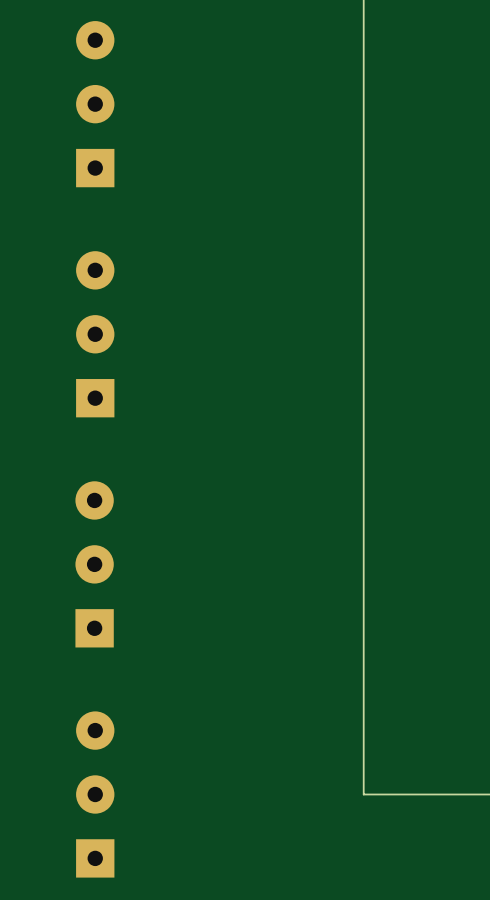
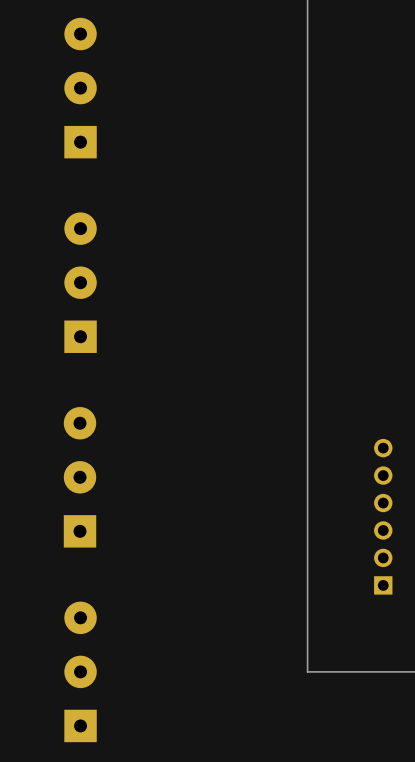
part: none -> (383, 516)

